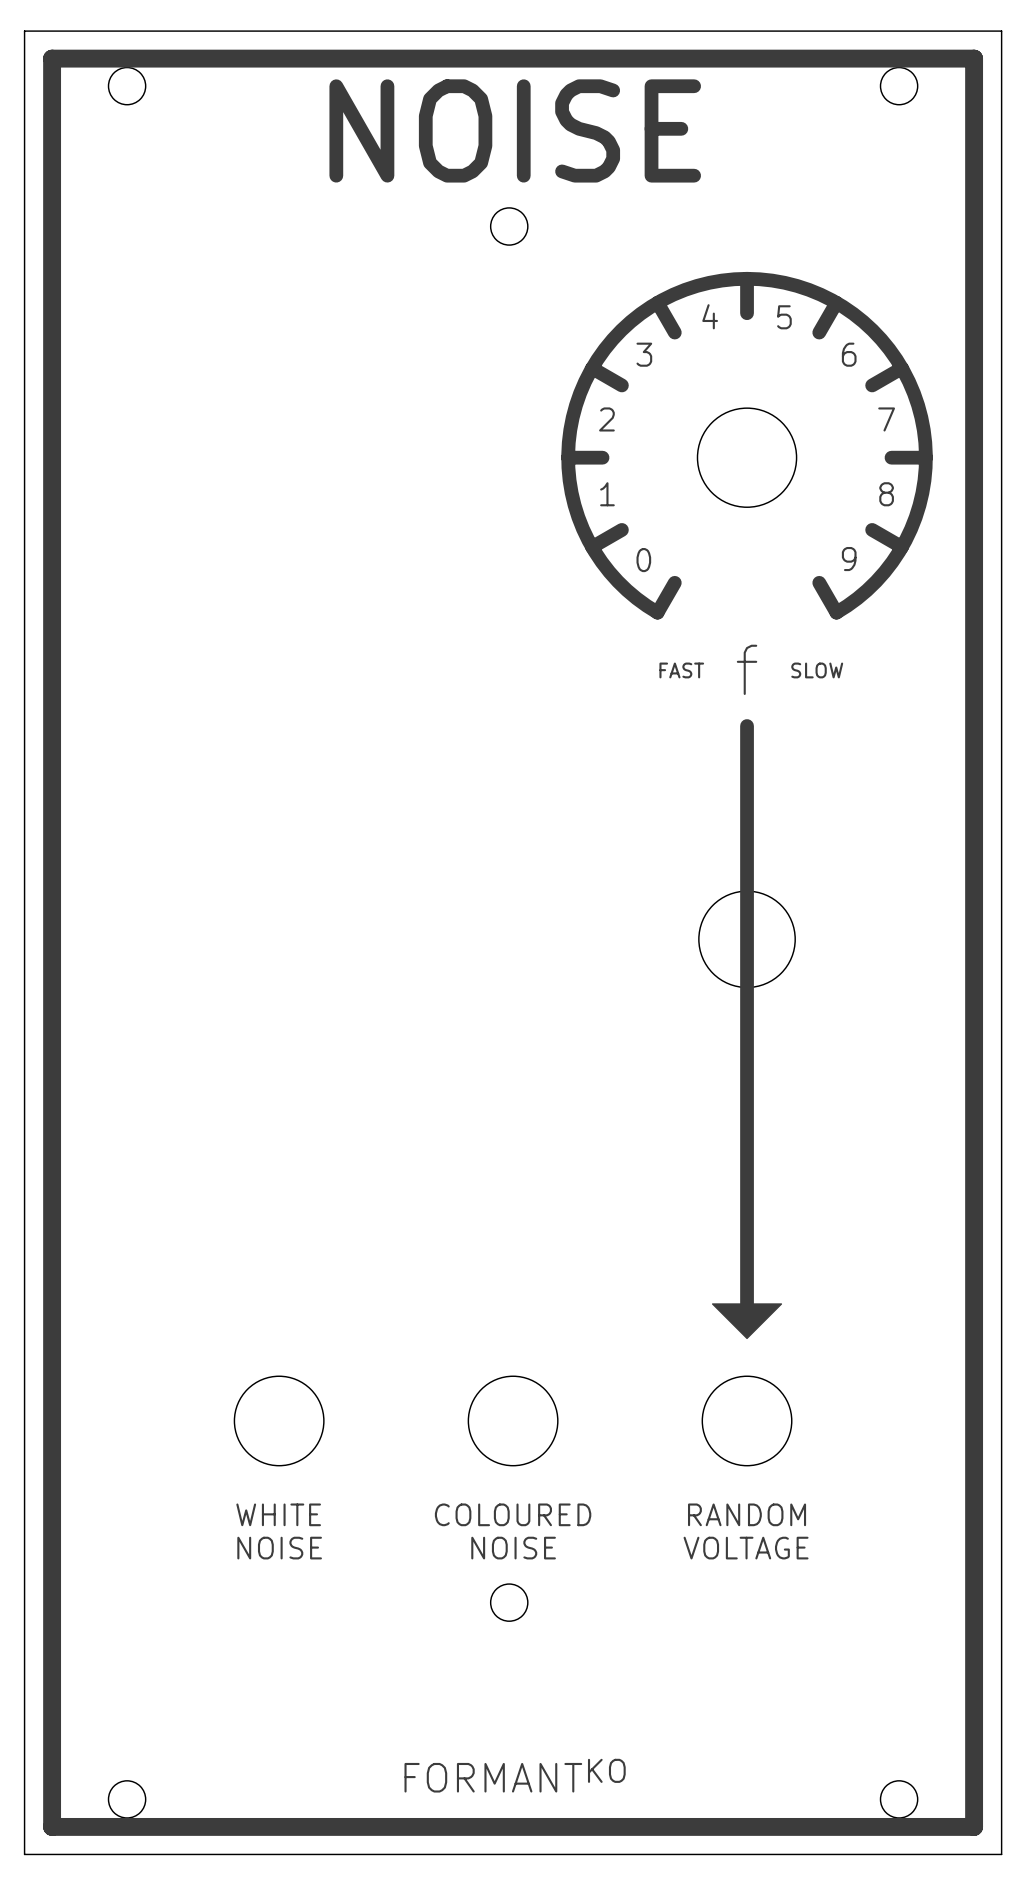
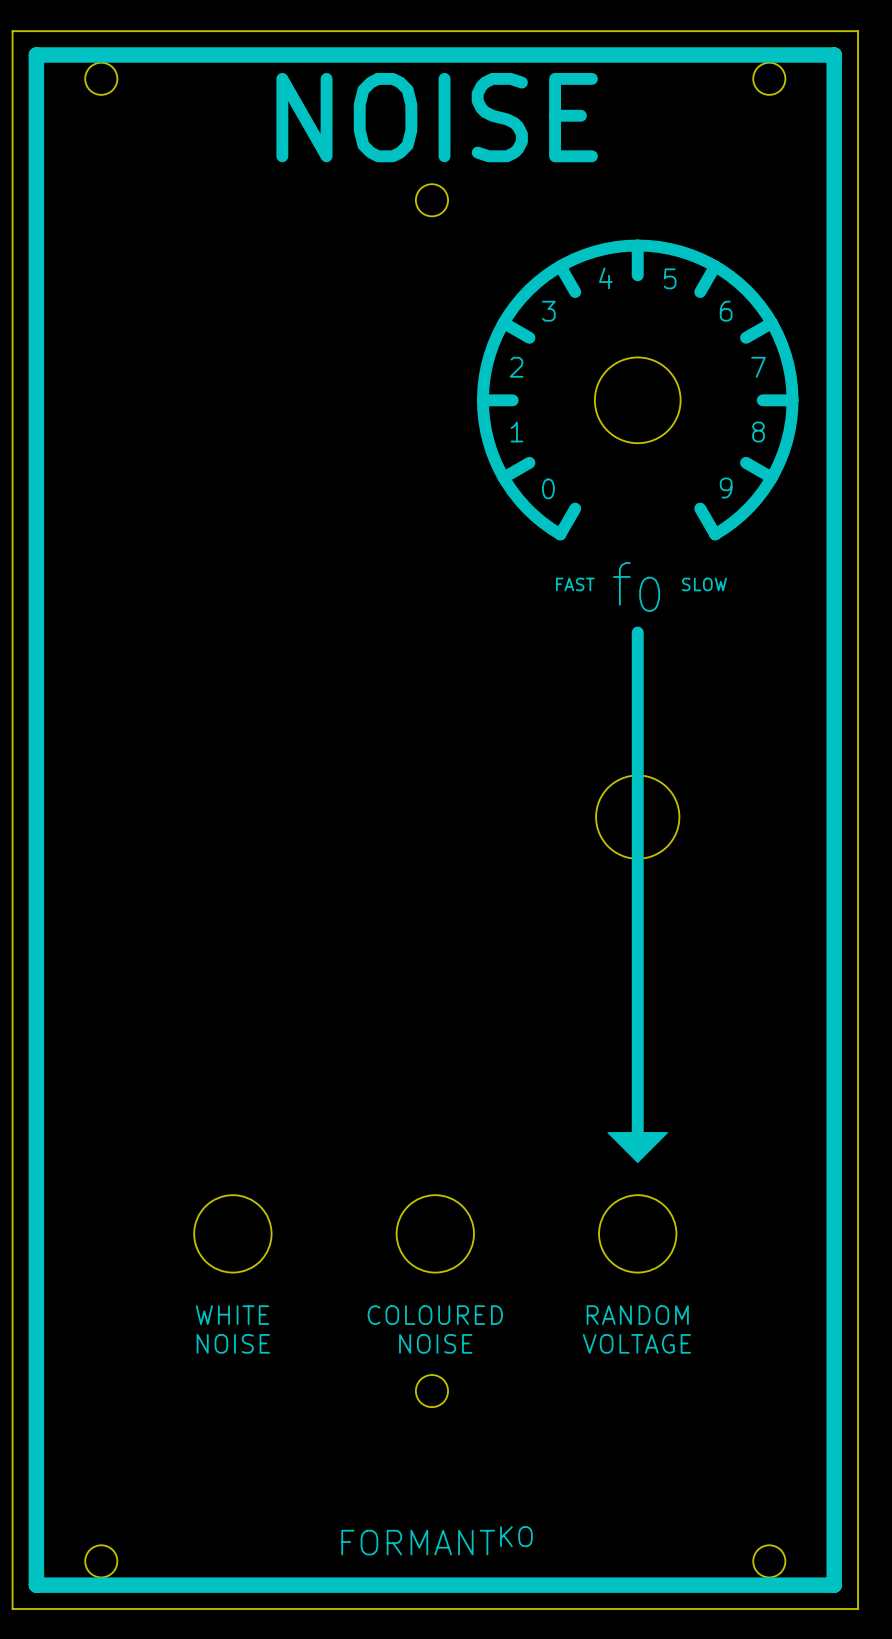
drawing: [659, 644, 844, 695] -> none
text: none -> FAST (575, 584)
text: none -> SLOW (704, 584)
text: none -> f0 (636, 587)

